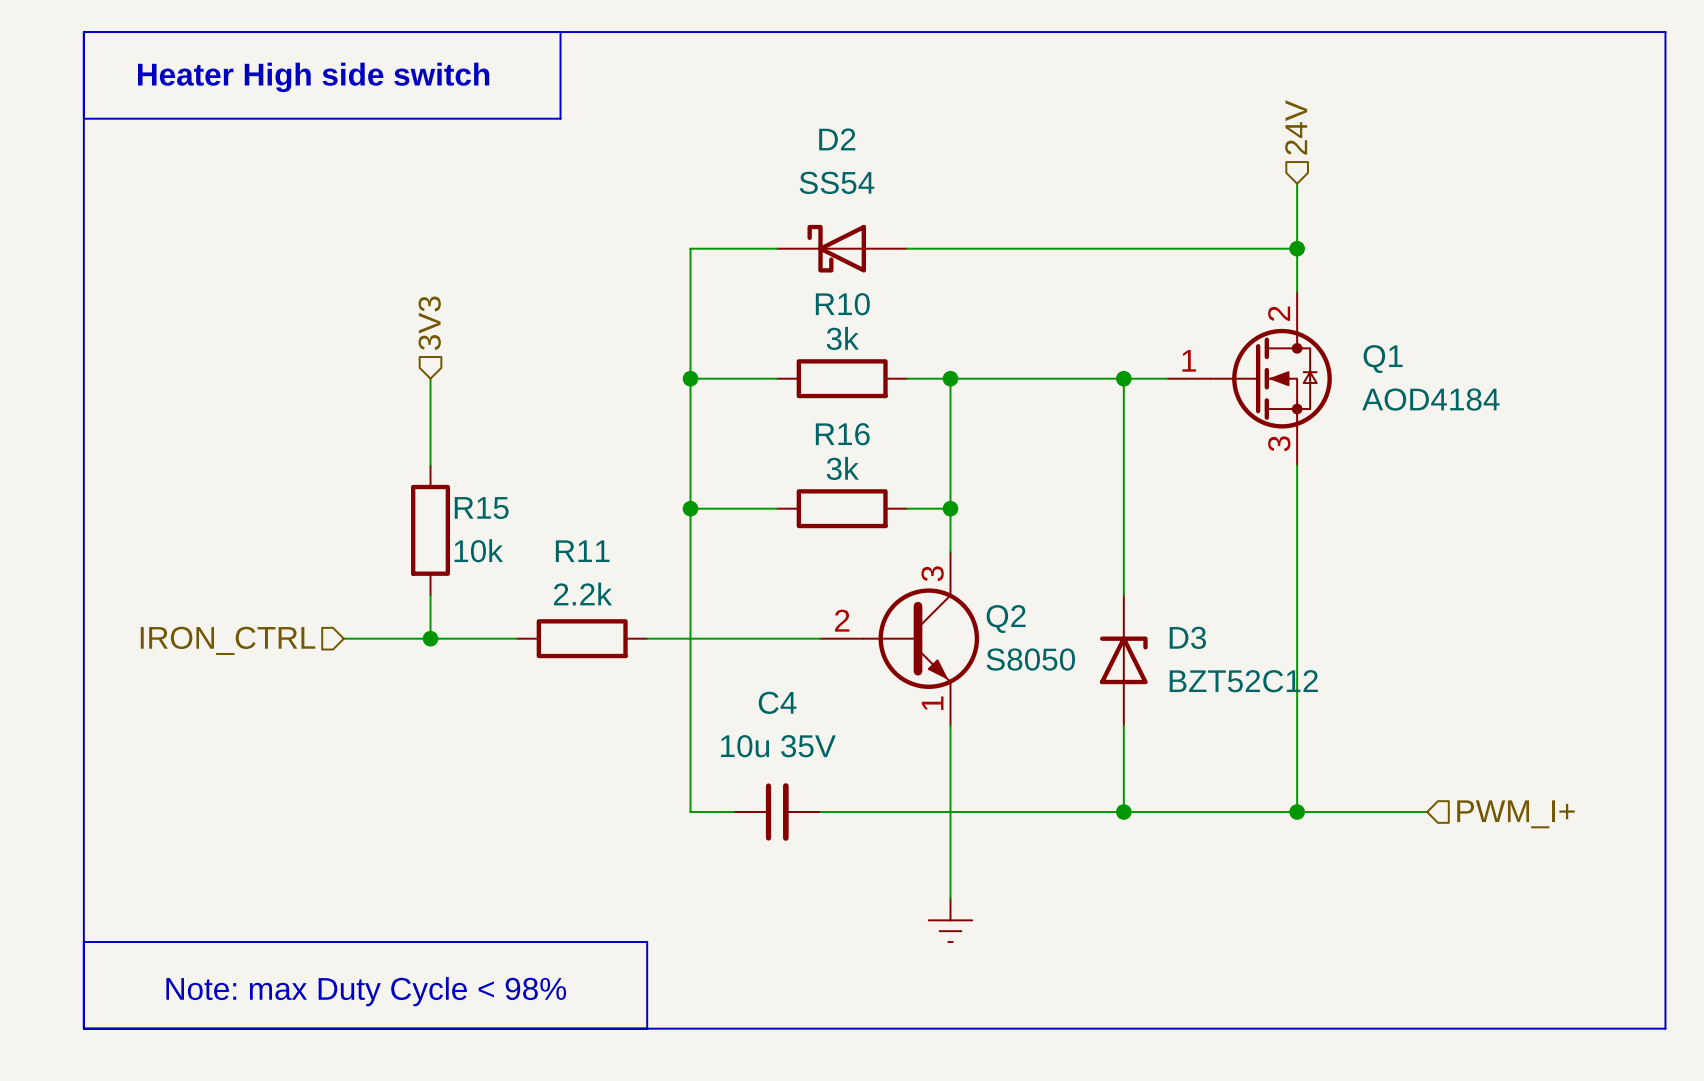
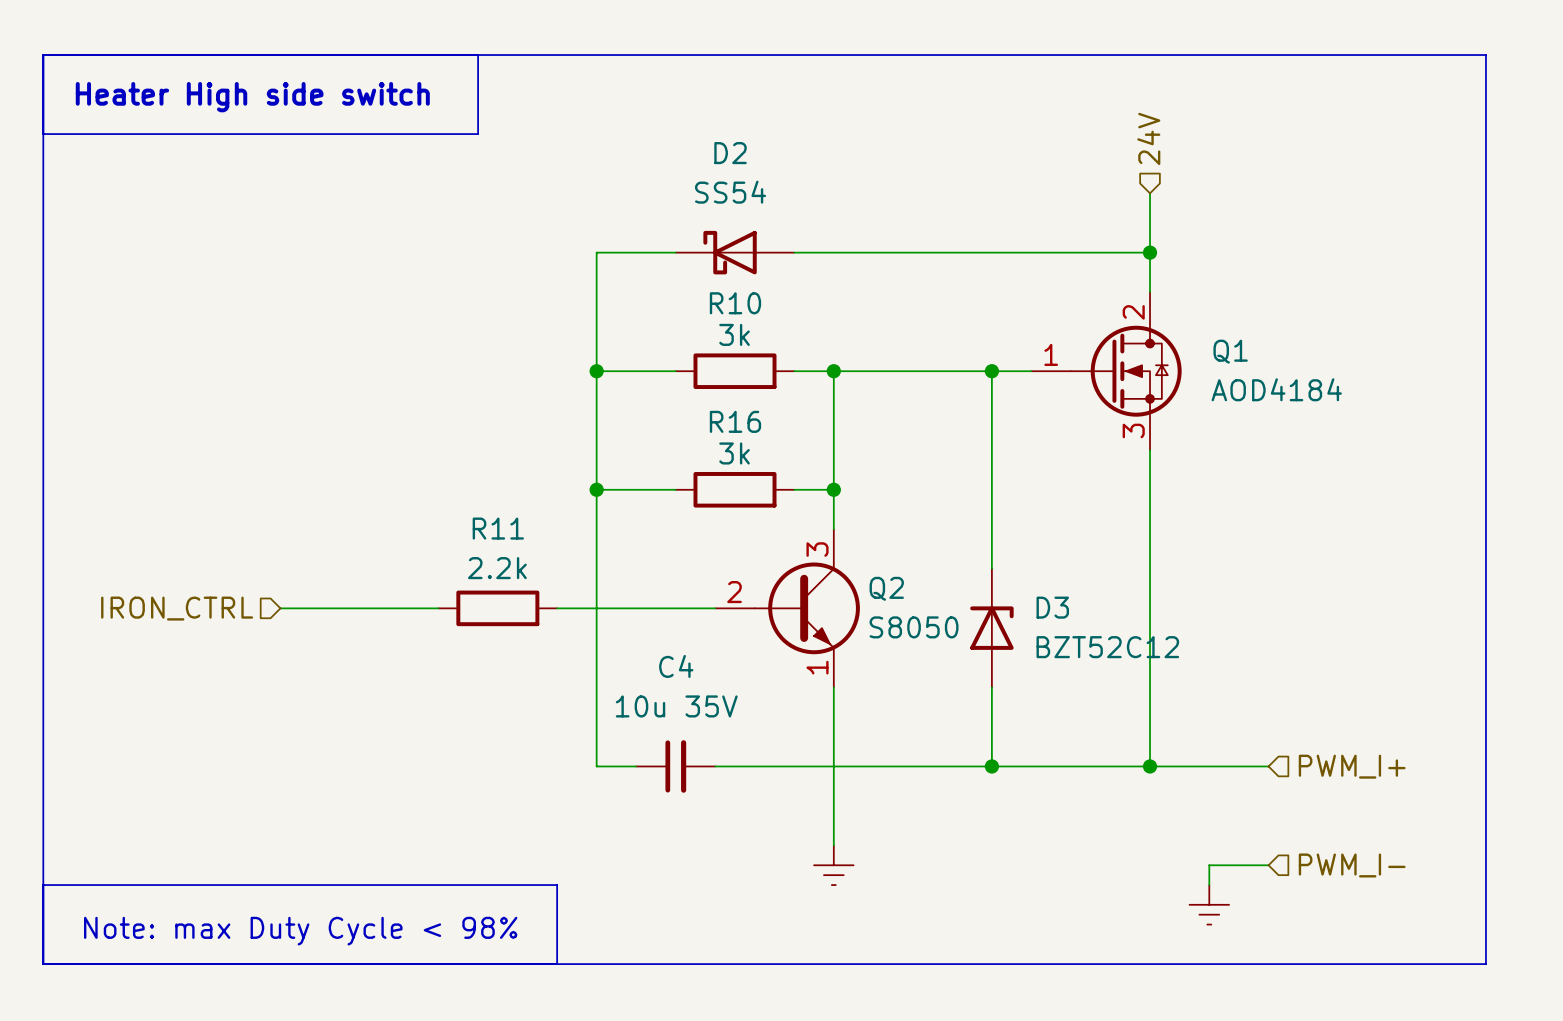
hierarchical label: 3V3 (429, 323) -> none
wire: (430, 378) (430, 465) -> none
R15: 10k (430, 530) -> none
wire: (430, 595) (430, 638) -> none
junction: (430, 638) -> none
wire: none -> (1268, 865) (1209, 865) (1209, 885)
hierarchical label: none -> PWM_I- (1352, 865)
power symbol: none -> (1209, 904)

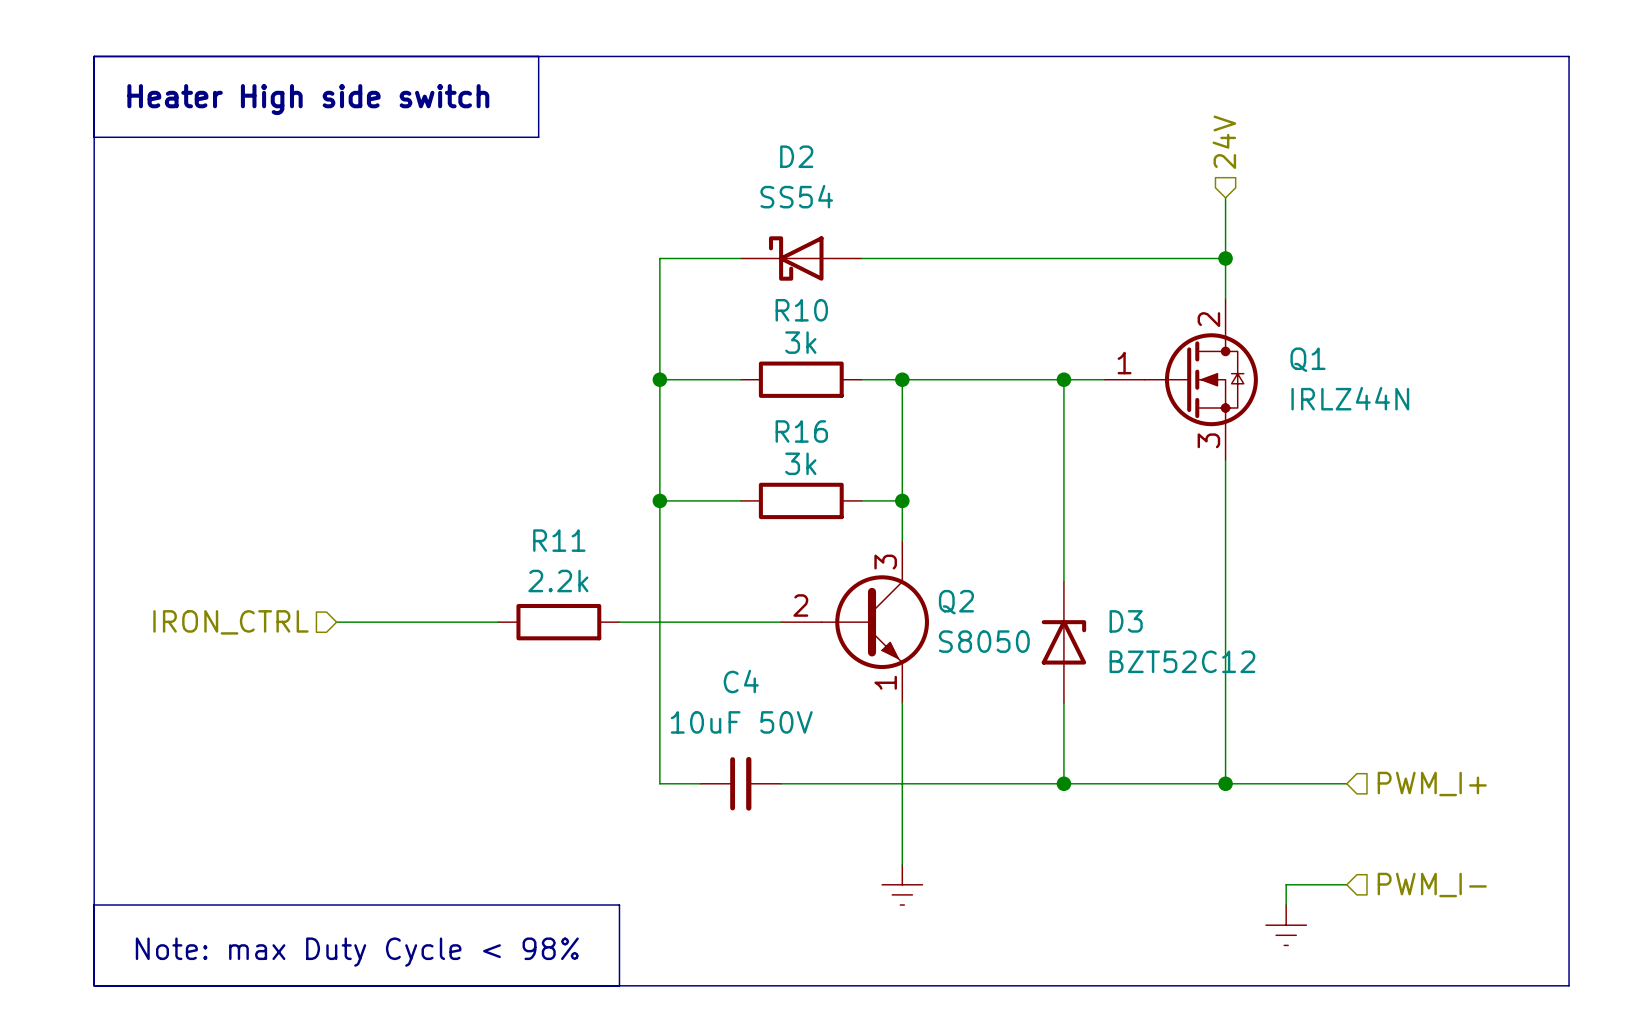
Q1 value: AOD4184 (1276, 389) -> IRLZ44N (1350, 398)
C4 value: 10u 35V (676, 706) -> 10uF 50V (741, 722)

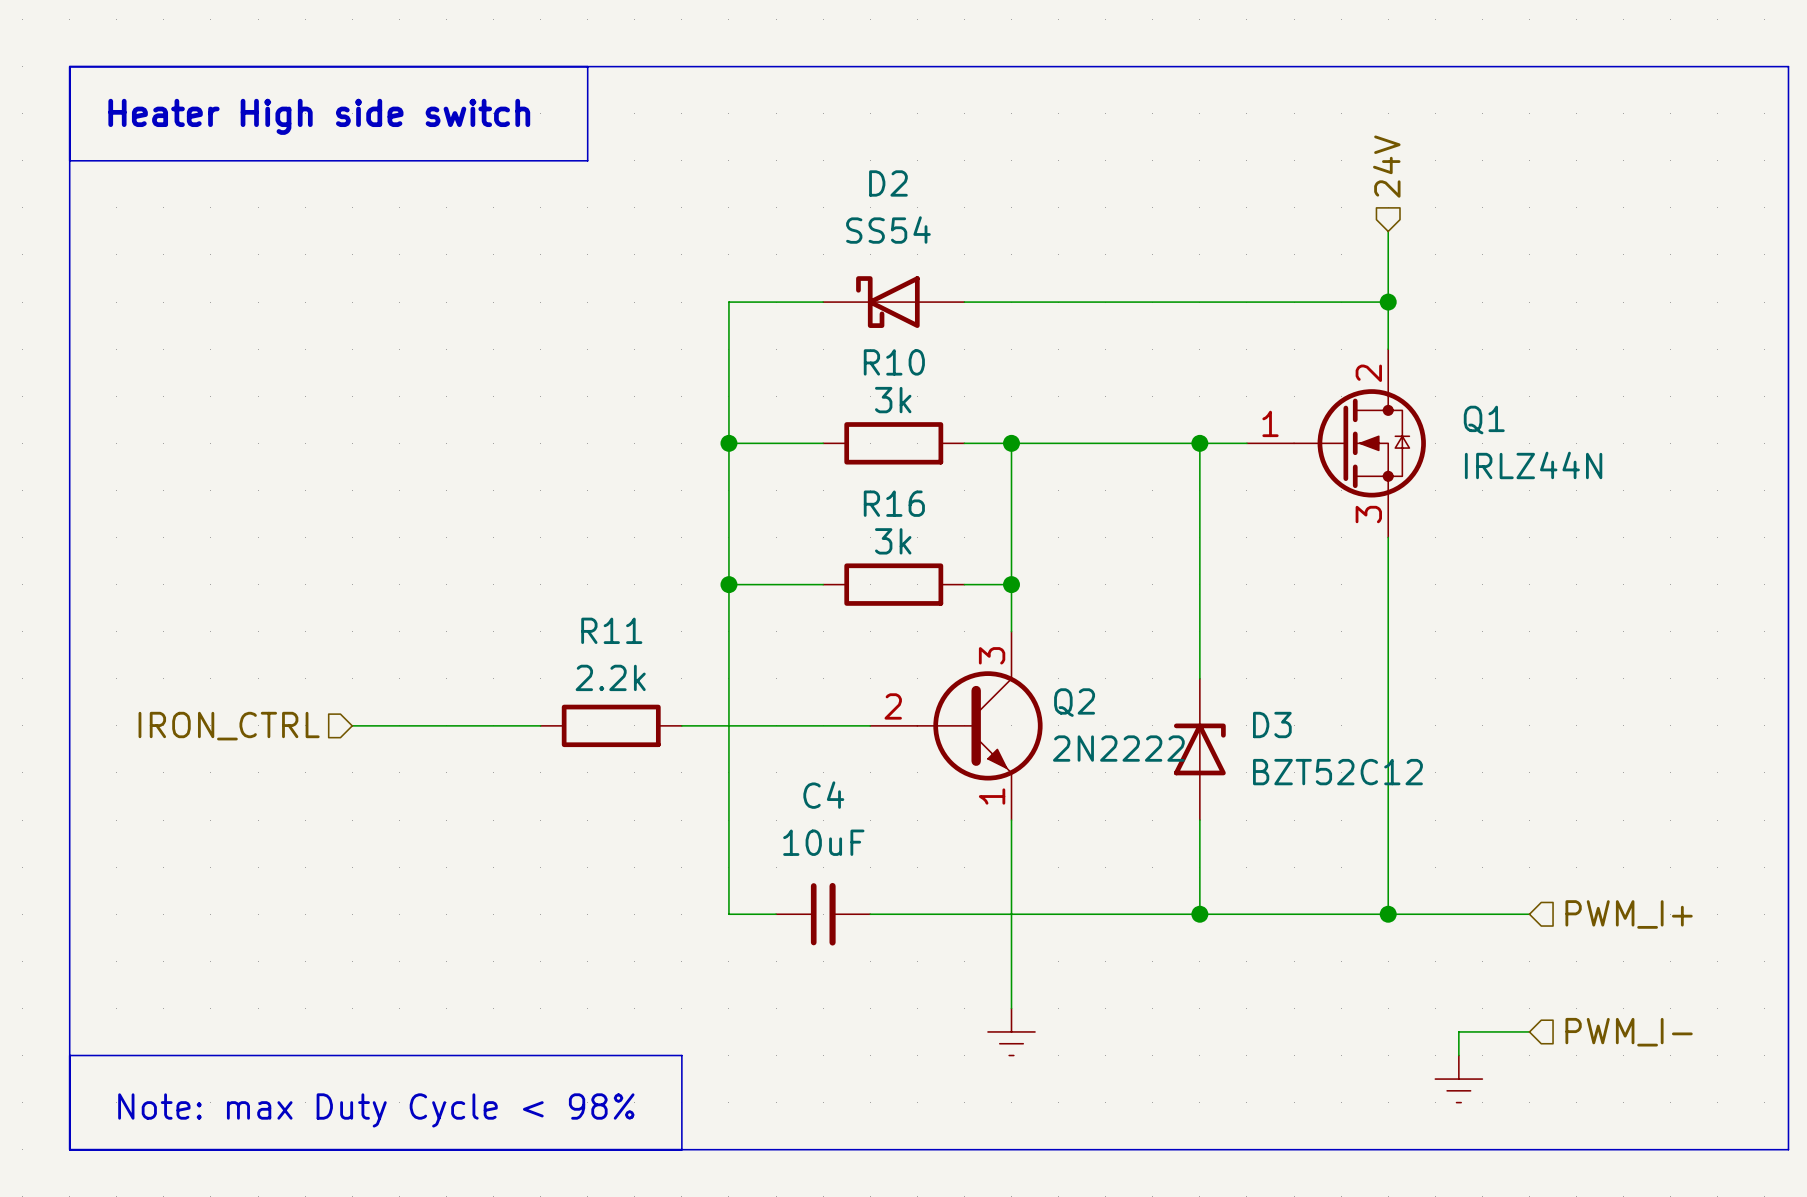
Q2 value: S8050 (984, 641) -> 2N2222 (1118, 748)
C4 value: 10uF 50V (741, 722) -> 10uF (823, 842)

